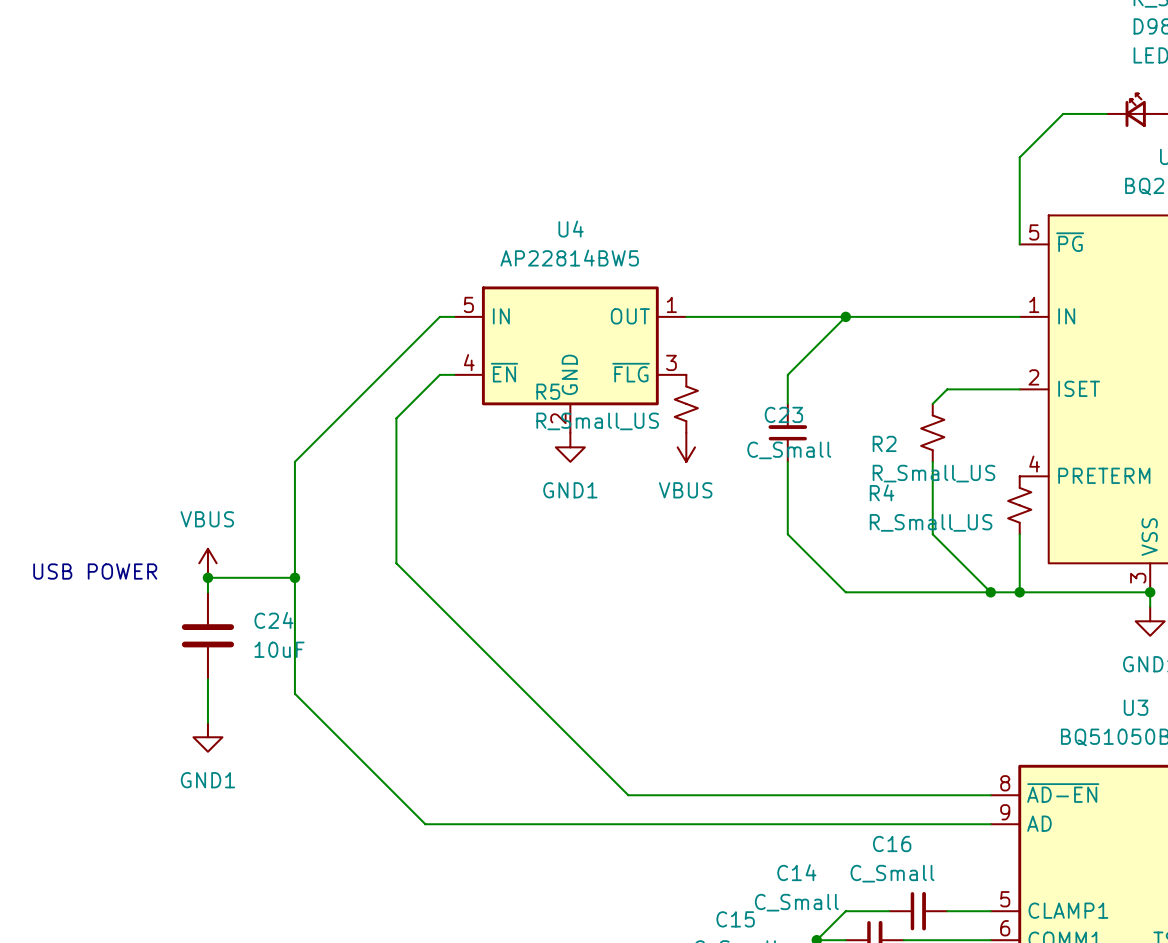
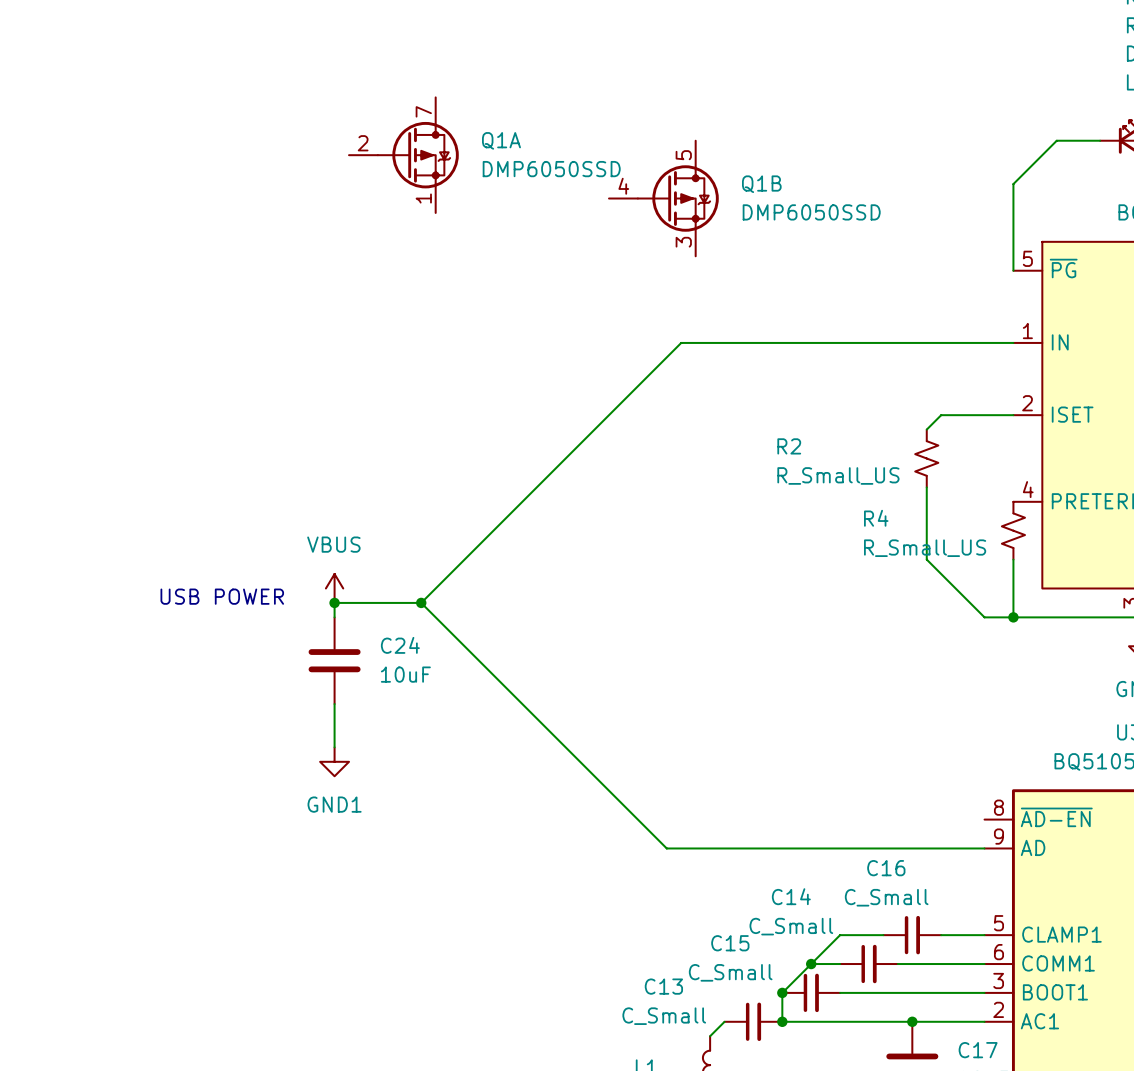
Q1A: none -> DMP6050SSD (403, 155)
Q1B: none -> DMP6050SSD (663, 198)
wire: (454, 316) (439, 316) (294, 461) (294, 693) (425, 824) (671, 824) -> (421, 602) (666, 848)
wire: none -> (681, 342) (421, 602)
wire: (845, 316) (787, 374) (787, 403) -> none
junction: (845, 316) -> none
U4: AP22814BW5 (570, 359) -> none
wire: (454, 374) (439, 374) (396, 418) (396, 563) (628, 795) (990, 795) -> none
R5: R_Small_US (686, 403) -> none
C23: C_Small (787, 432) -> none
R2 name position: R2 (884, 443) -> R2 (789, 446)
power symbol: GND1 (570, 447) -> none
power symbol: VBUS (686, 447) -> none
wire: (787, 461) (787, 534) (845, 592) (990, 592) -> none
R2 value position: R_Small_US (933, 473) -> R_Small_US (838, 475)
power symbol position: VBUS (207, 563) -> VBUS (334, 588)
text position: USB POWER (95, 571) -> USB POWER (222, 596)
junction: (207, 577) -> none
wire: (294, 577) (207, 577) (207, 592) -> (421, 602) (334, 602) (334, 617)
junction position: (294, 577) -> (334, 602)
junction: none -> (421, 602)
junction: (990, 592) -> none
C24 position: (207, 635) -> (334, 660)
wire: (207, 679) (207, 722) -> (334, 704) (334, 747)
power symbol position: GND1 (207, 737) -> GND1 (334, 761)

